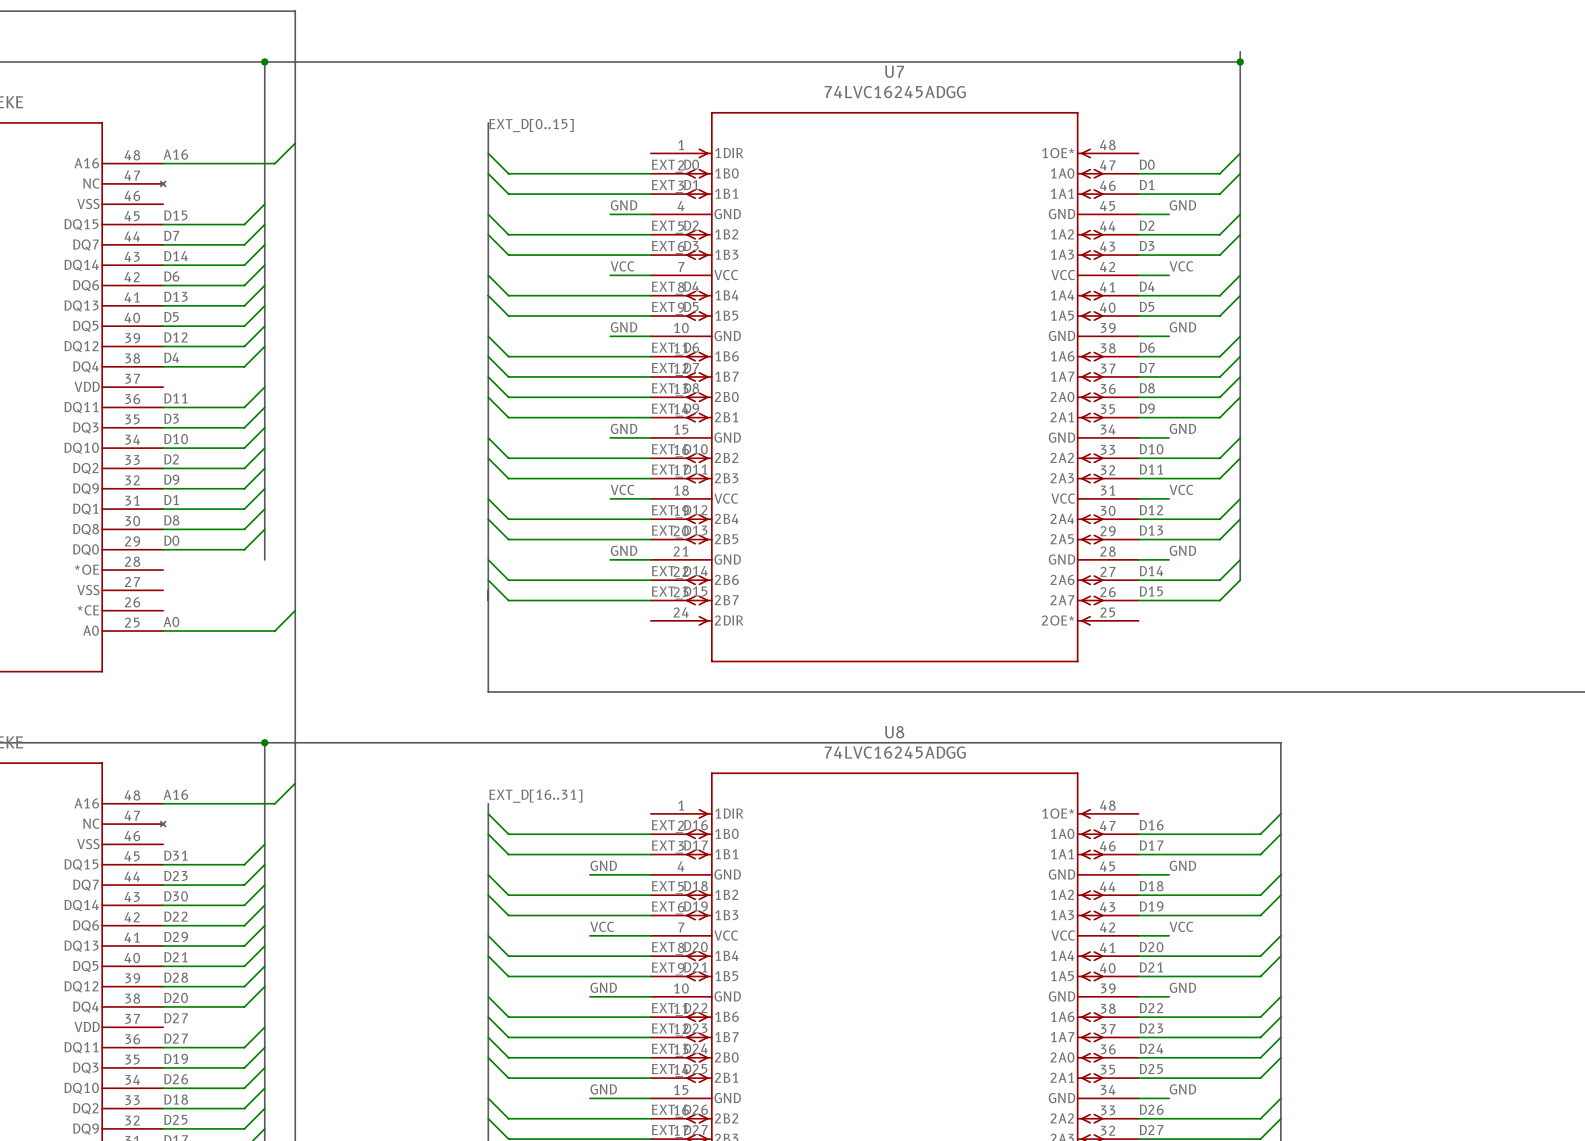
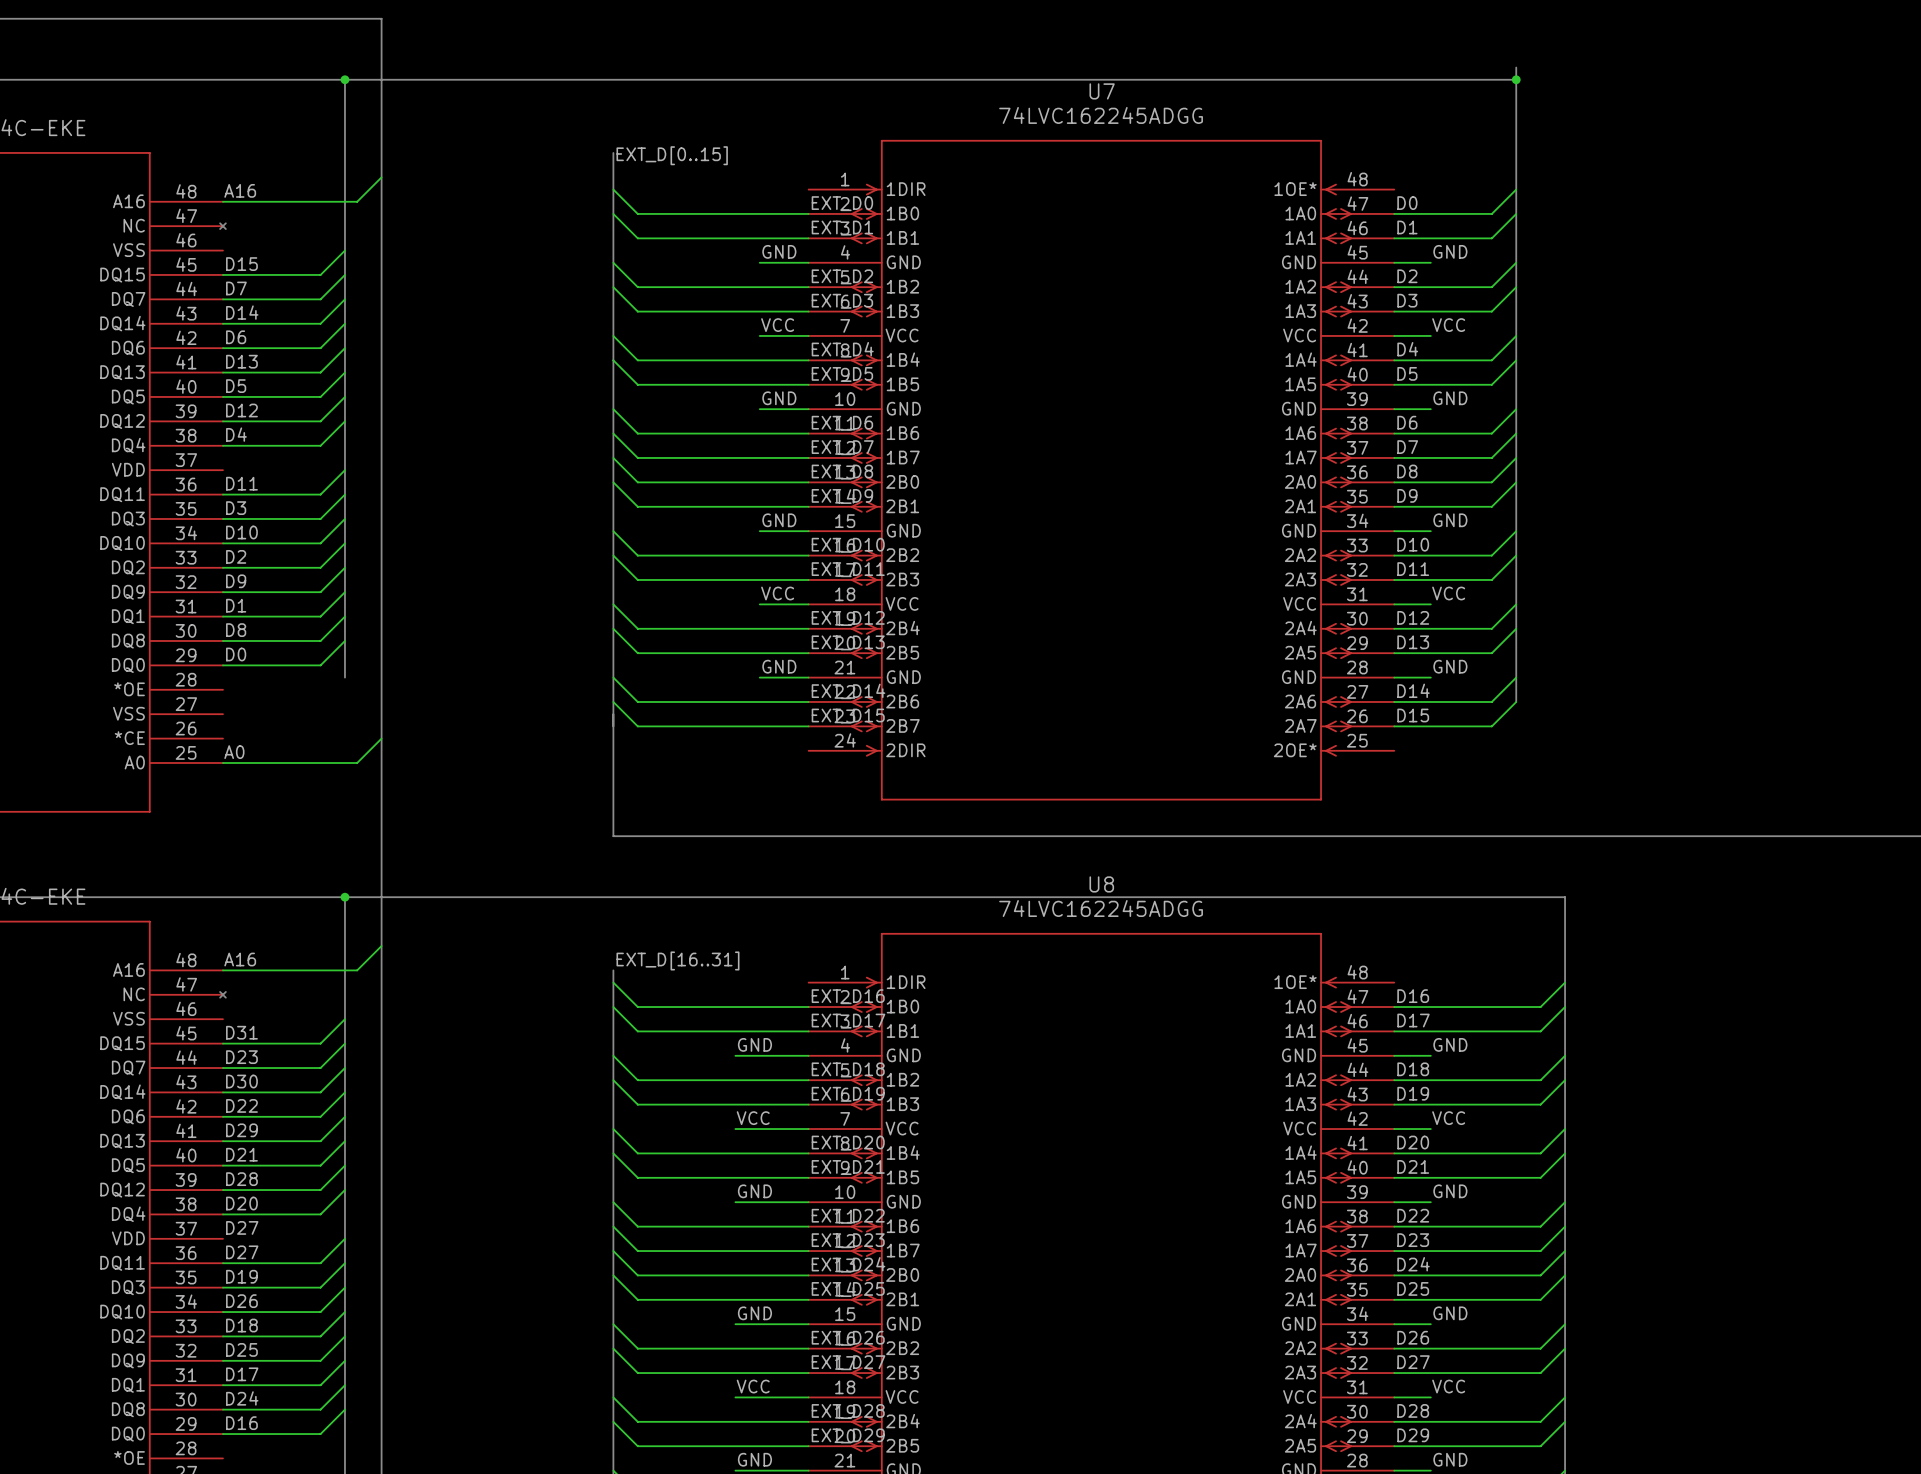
U7 value: 74LVC16245ADGG (895, 92) -> 74LVC162245ADGG (1101, 115)
U8 value: 74LVC16245ADGG (895, 752) -> 74LVC162245ADGG (1101, 908)

